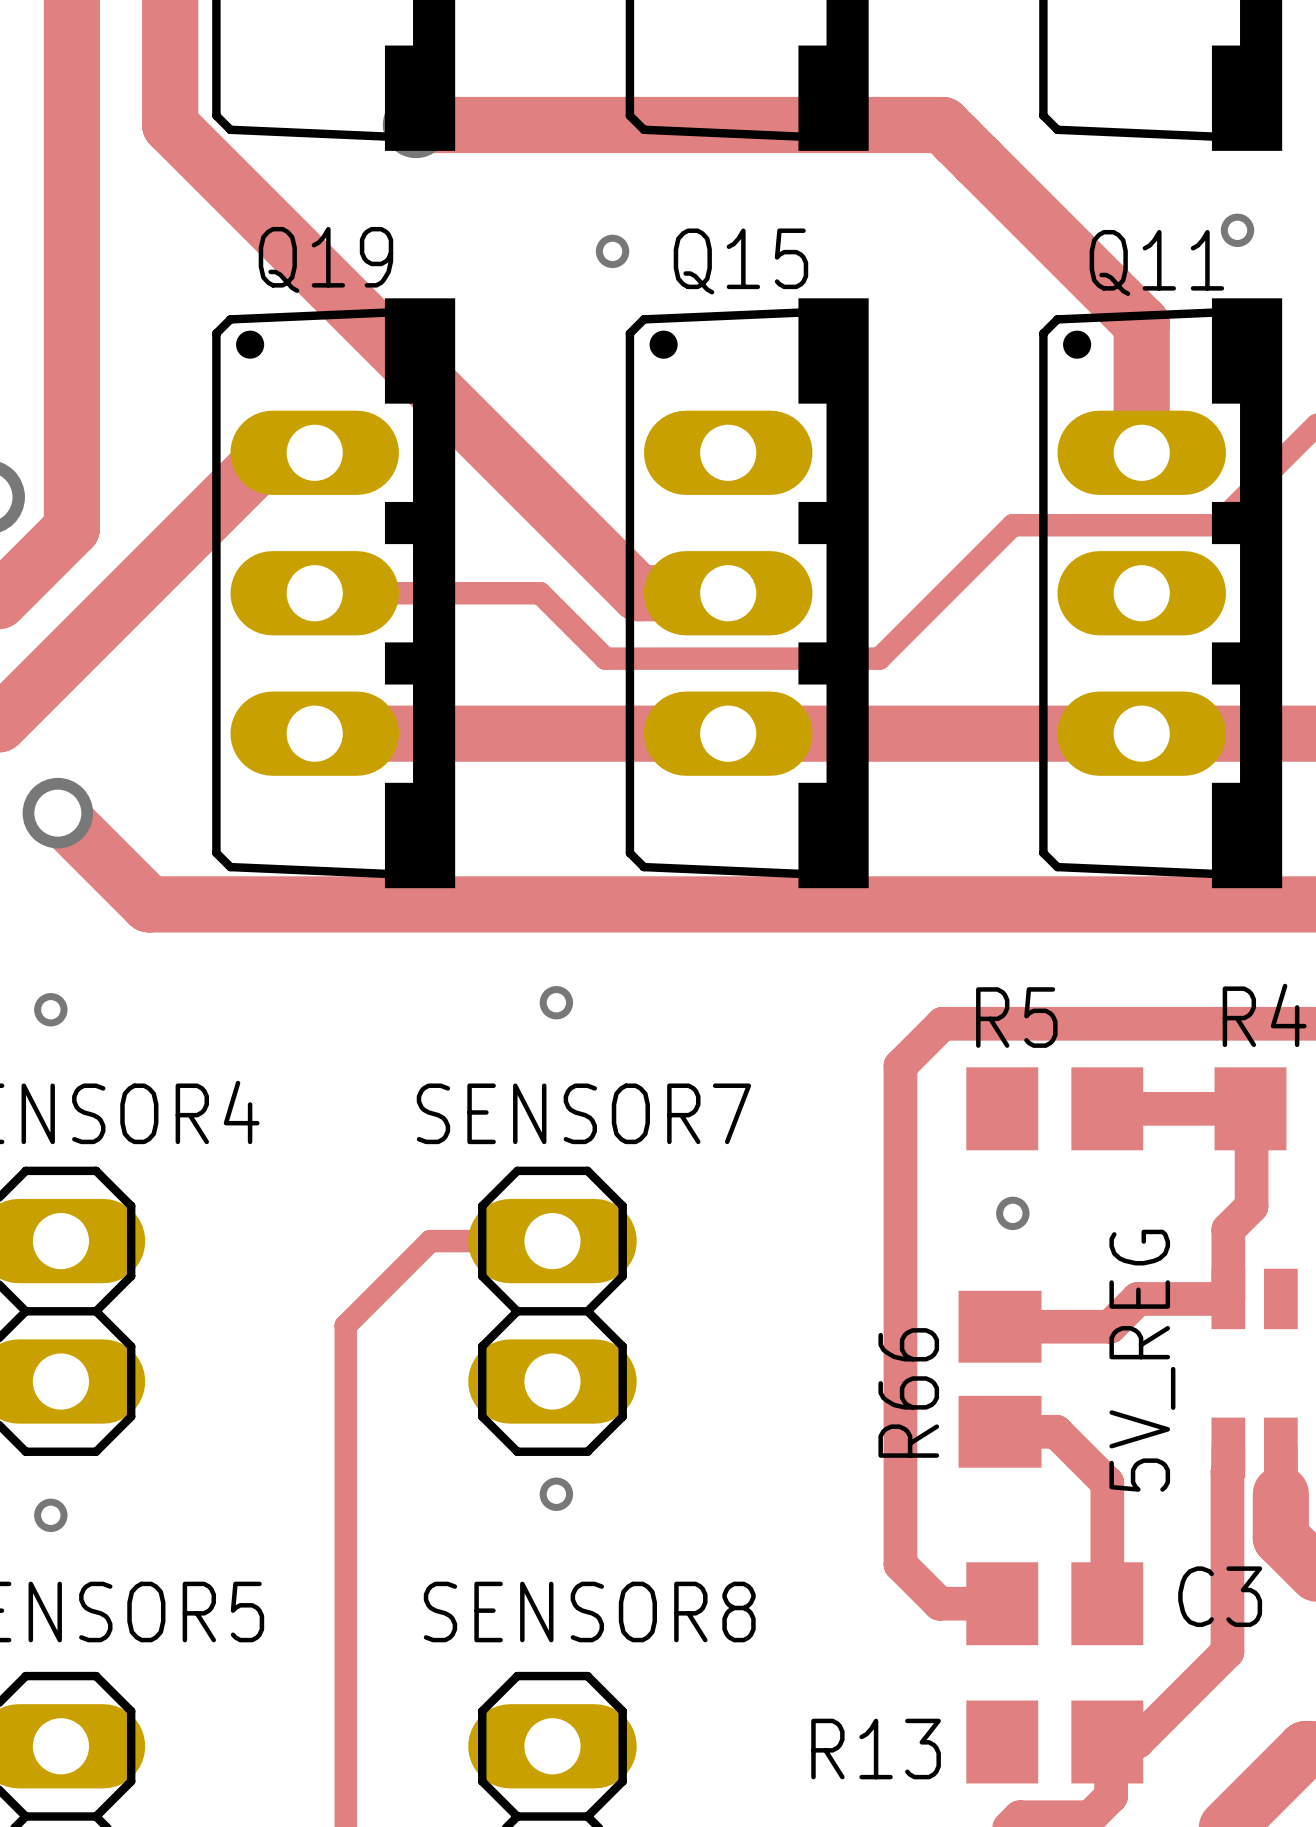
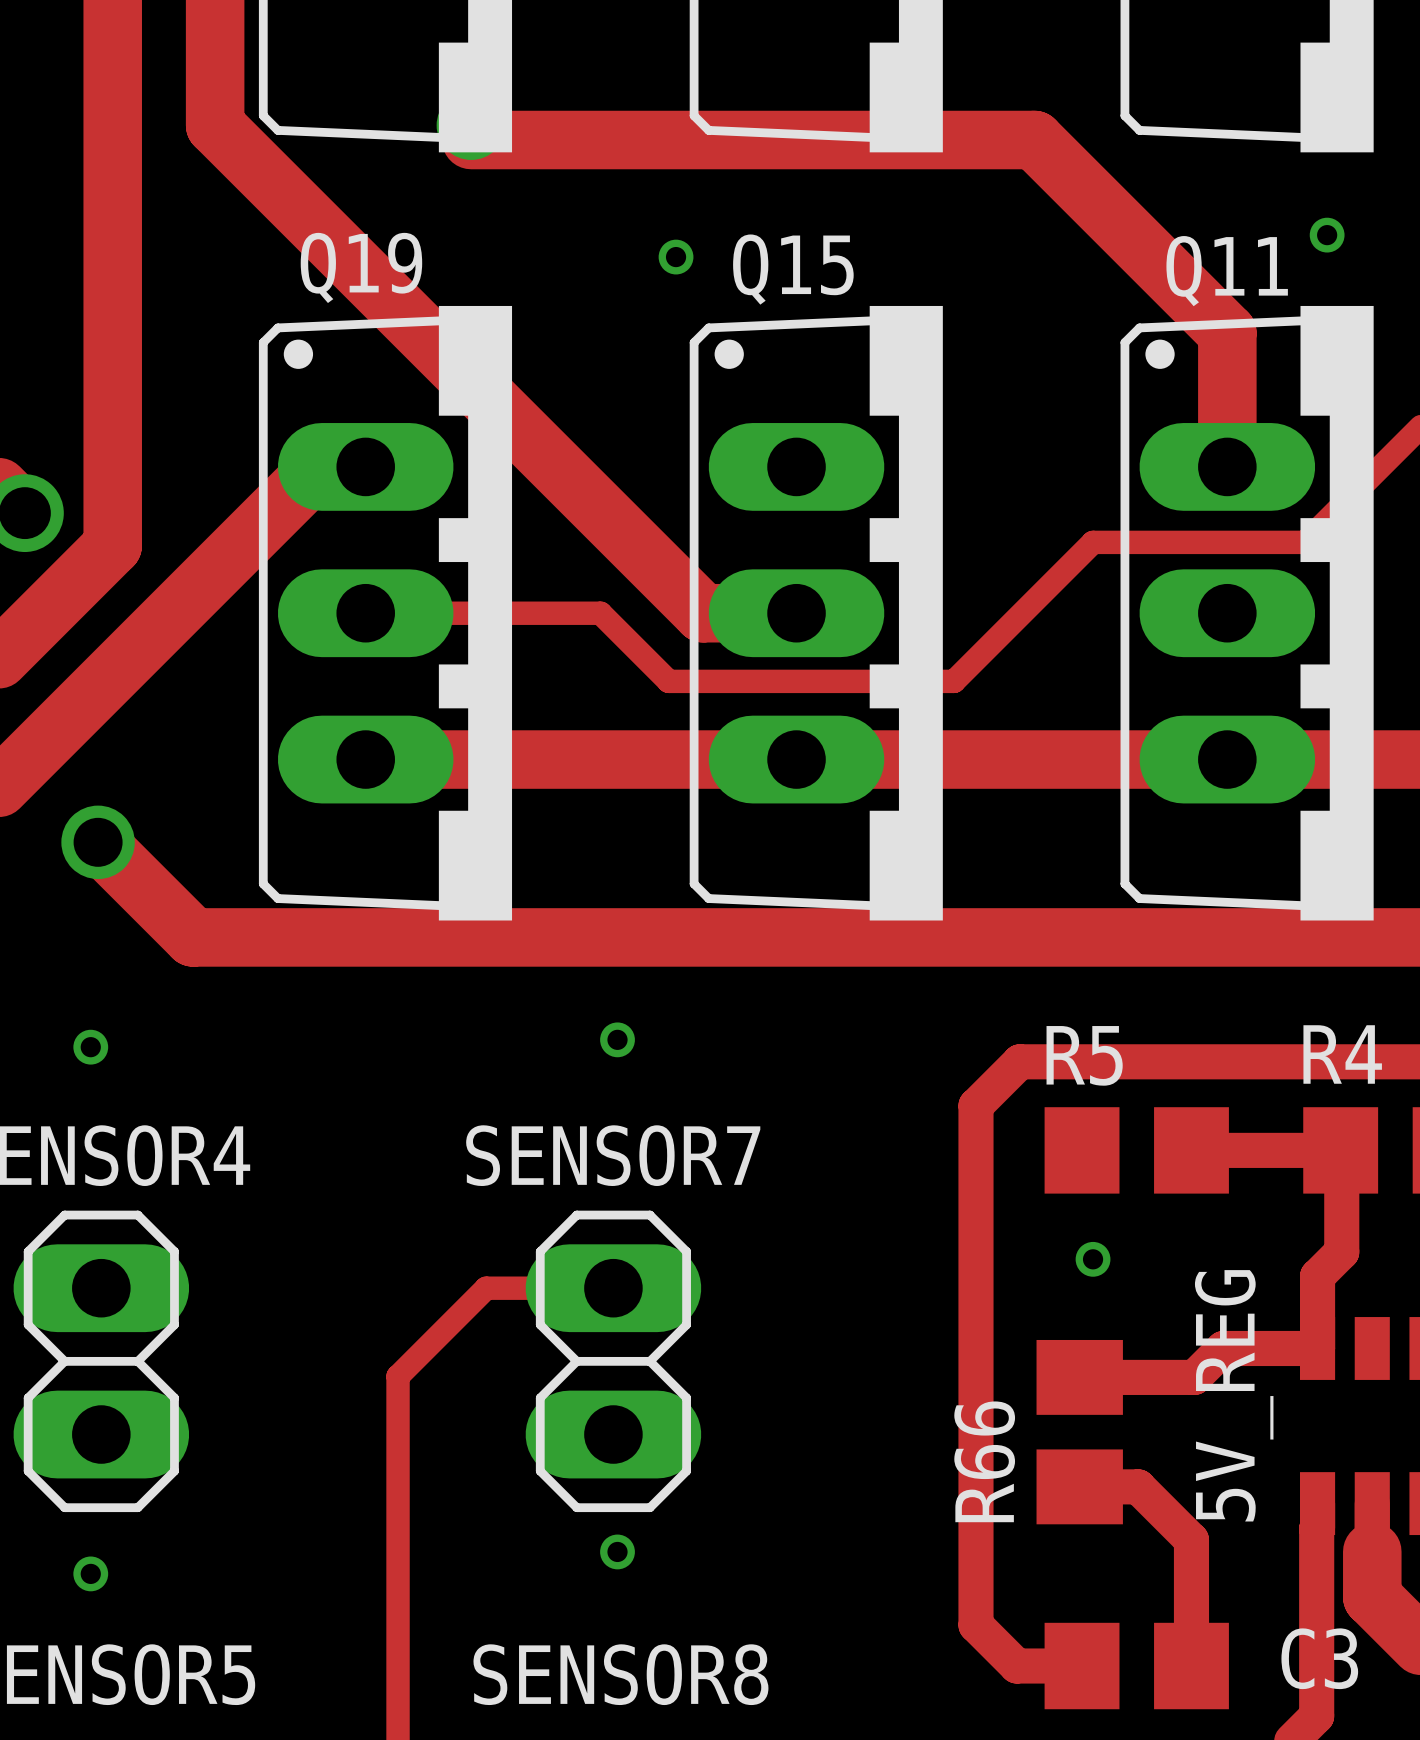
track: (415, 124) (942, 124) (956, 139) -> (471, 140) (1034, 140)

